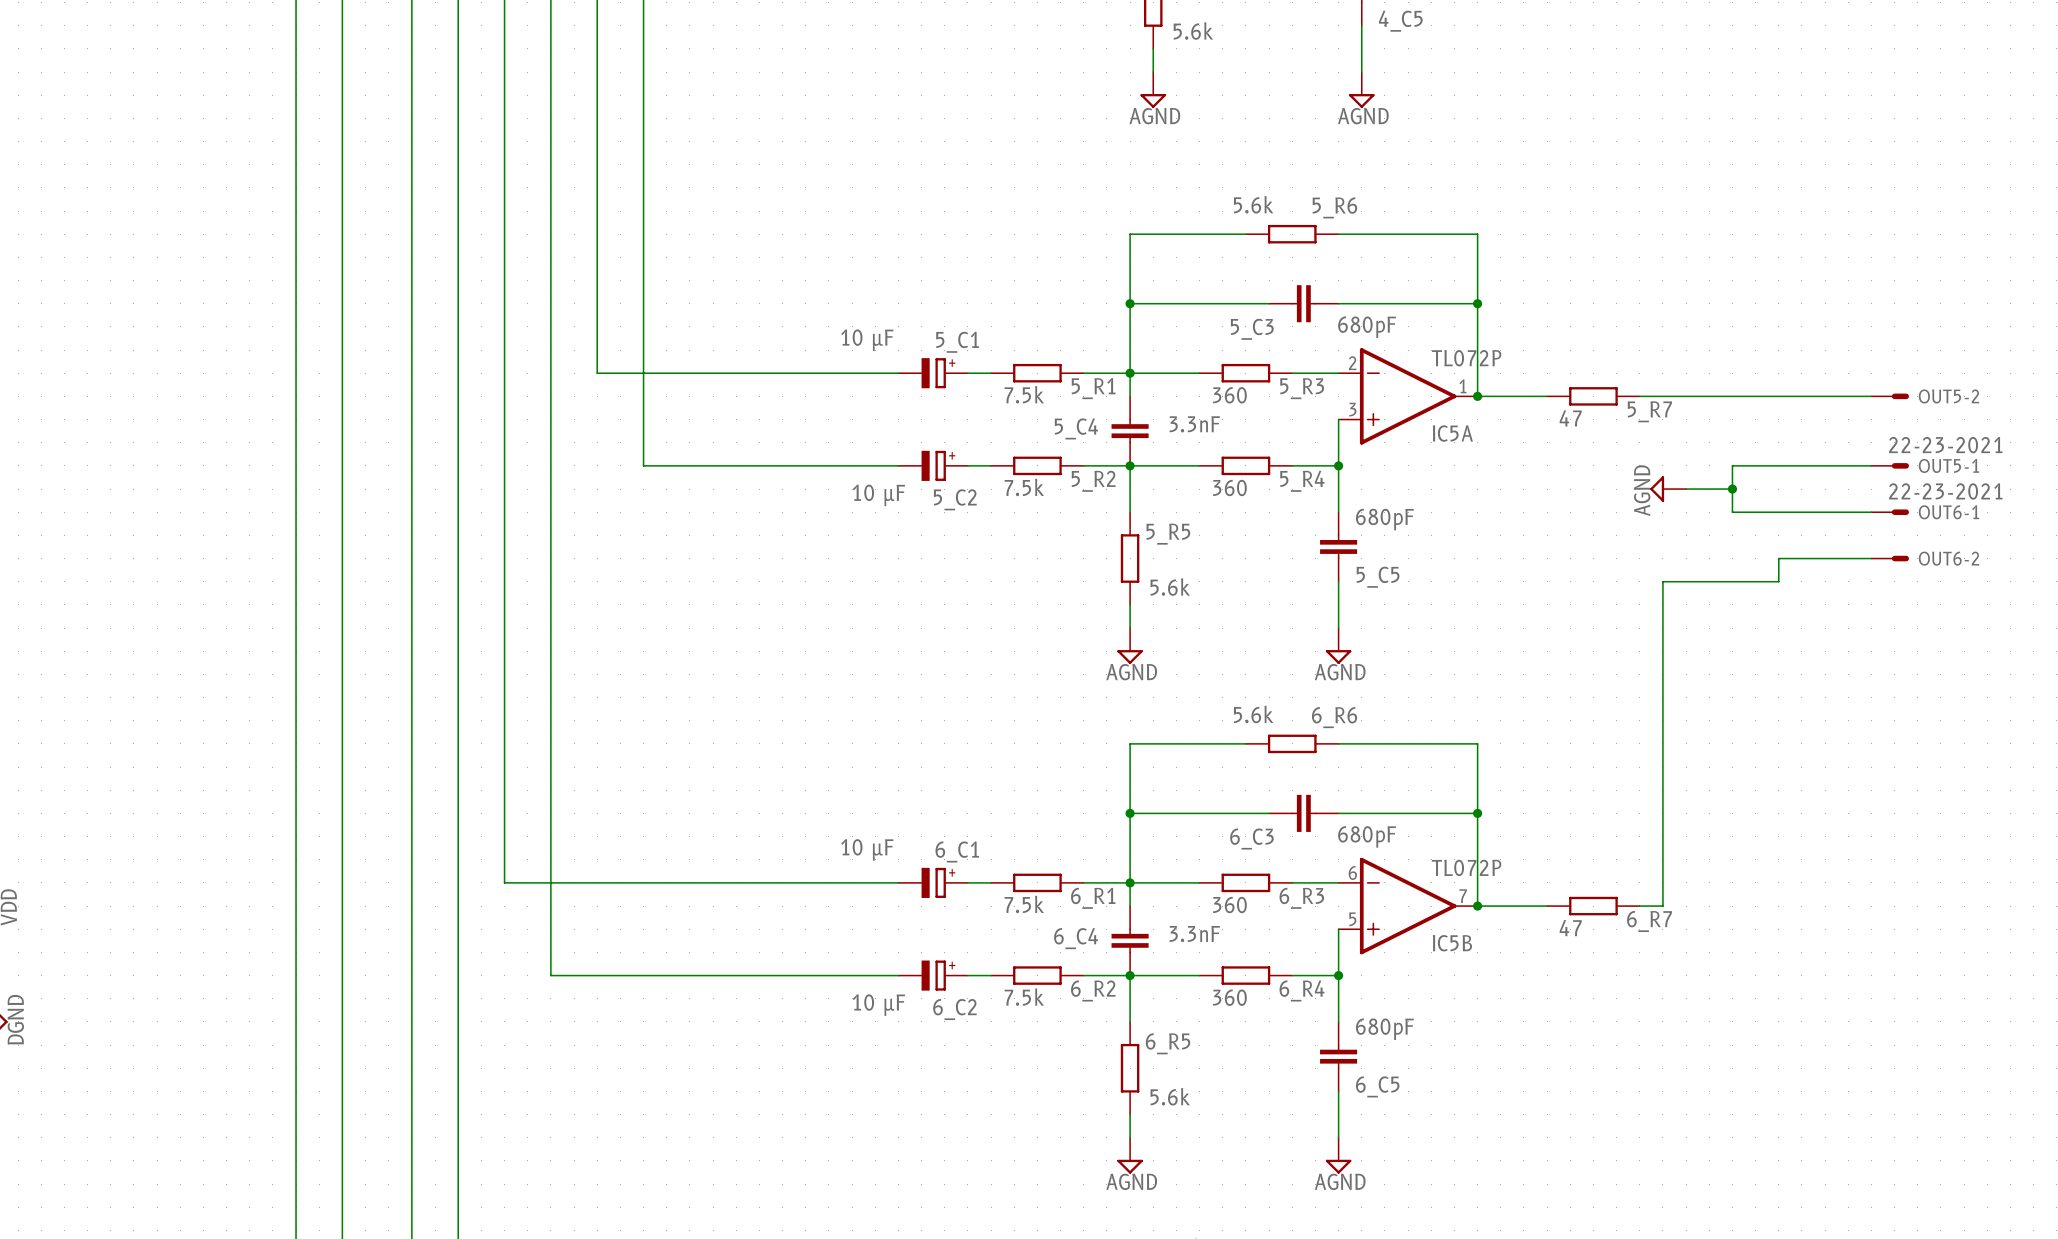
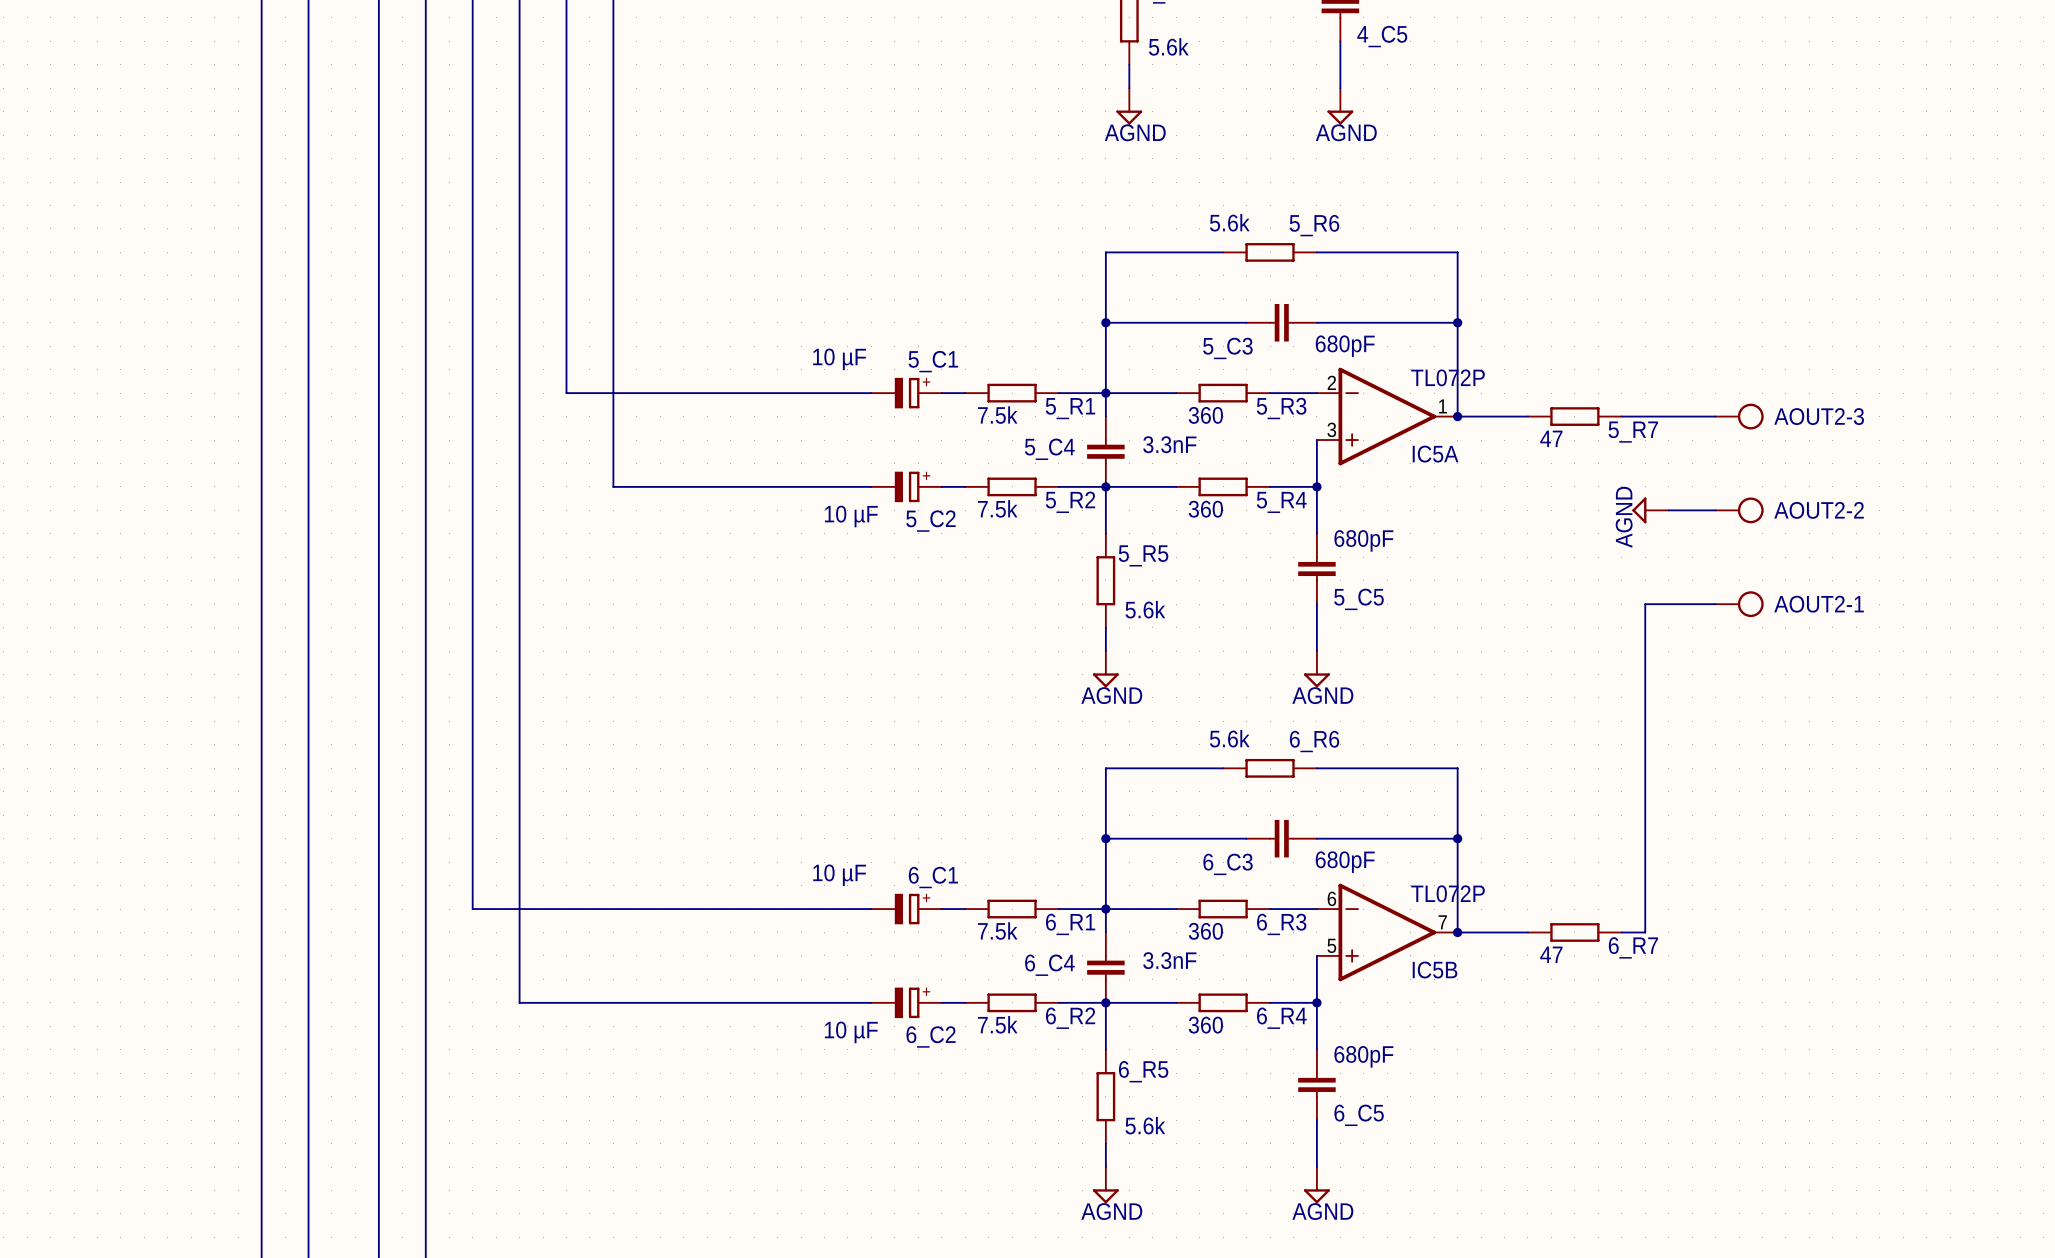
wire: (1732, 396) (1871, 396) -> none
AOUT2-3: none -> (1739, 416)
OUT5-2: (1890, 396) -> none
wire: (1871, 465) (1732, 465) (1732, 512) (1871, 512) -> none
OUT5-1: 22-23-2021 (1890, 465) -> none
junction: (1732, 489) -> none
AOUT2-2: none -> (1739, 510)
OUT6-1: 22-23-2021 (1890, 512) -> none
wire: (1871, 558) (1778, 558) (1778, 581) (1732, 581) -> none
OUT6-2: (1890, 558) -> none
AOUT2-1: none -> (1739, 604)

